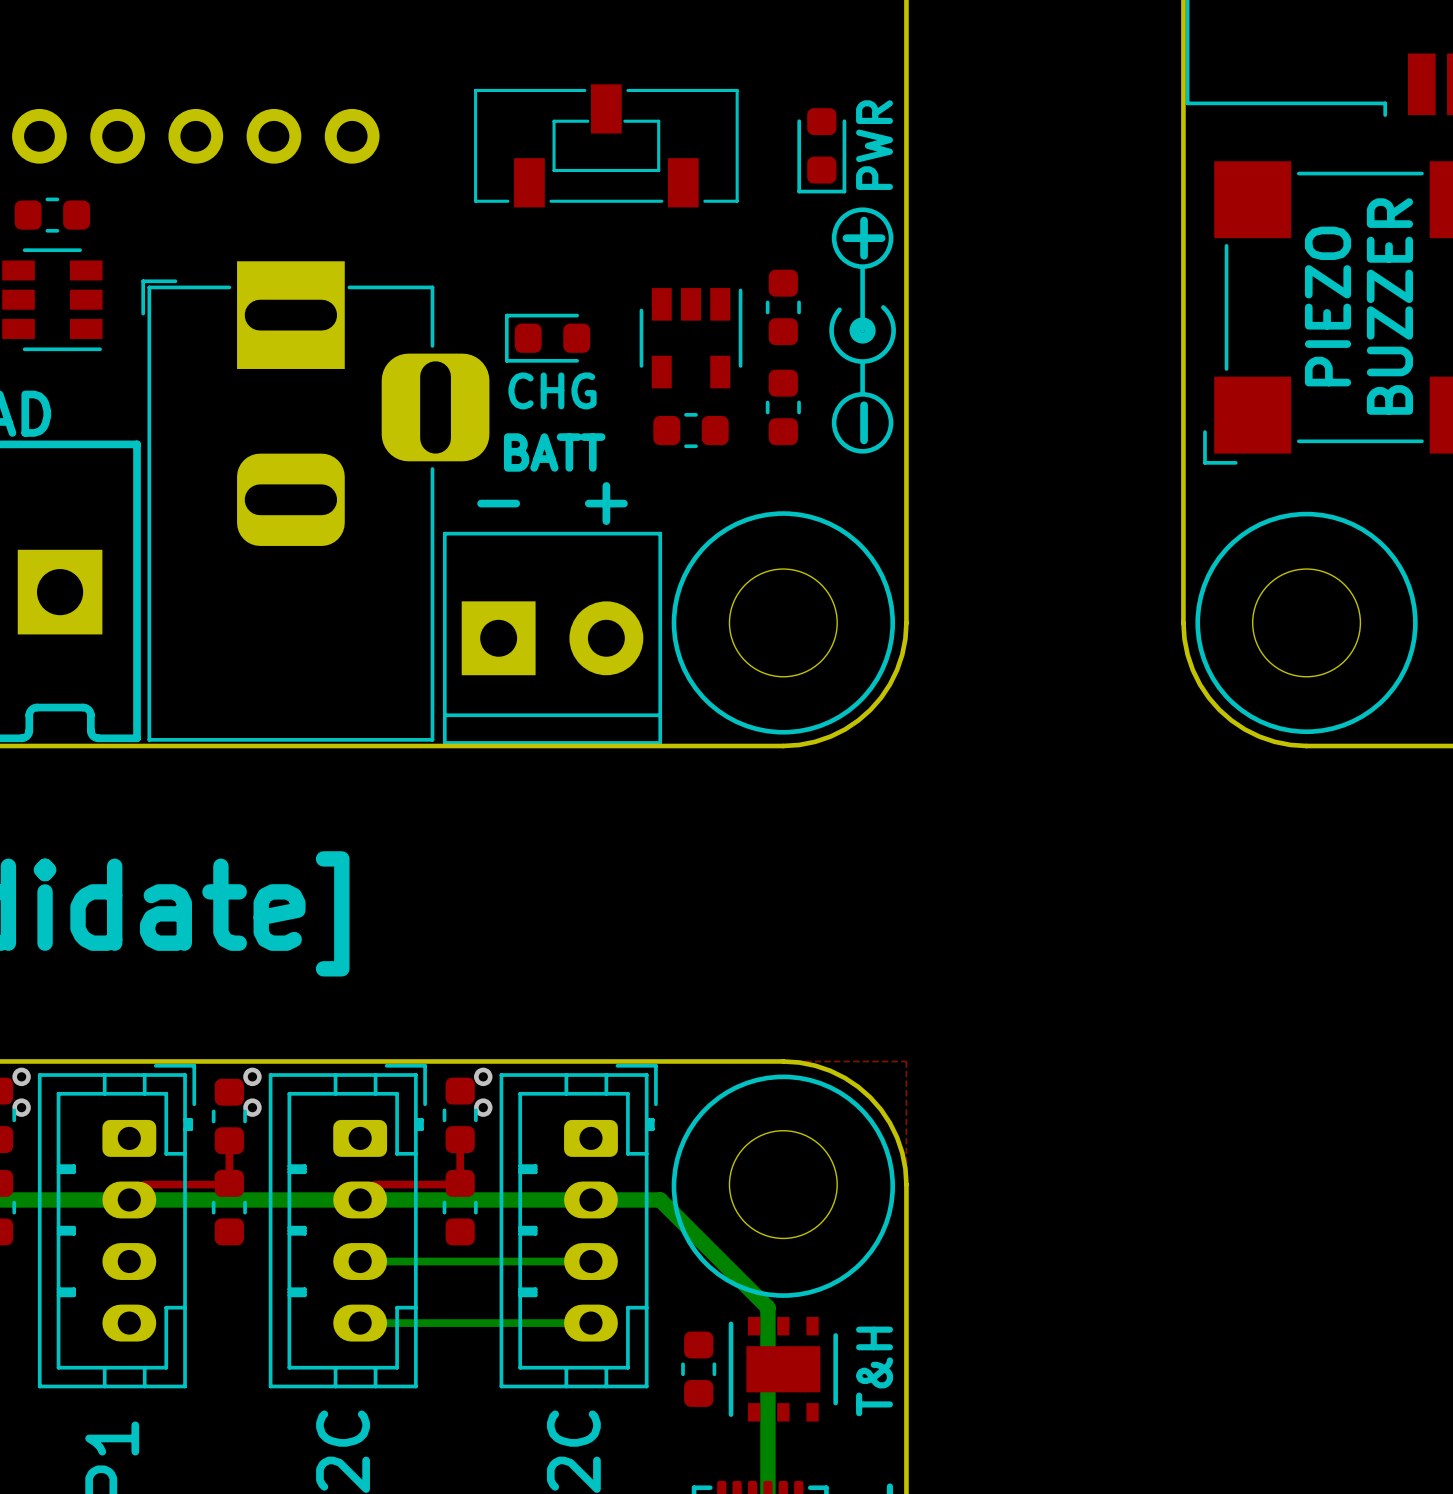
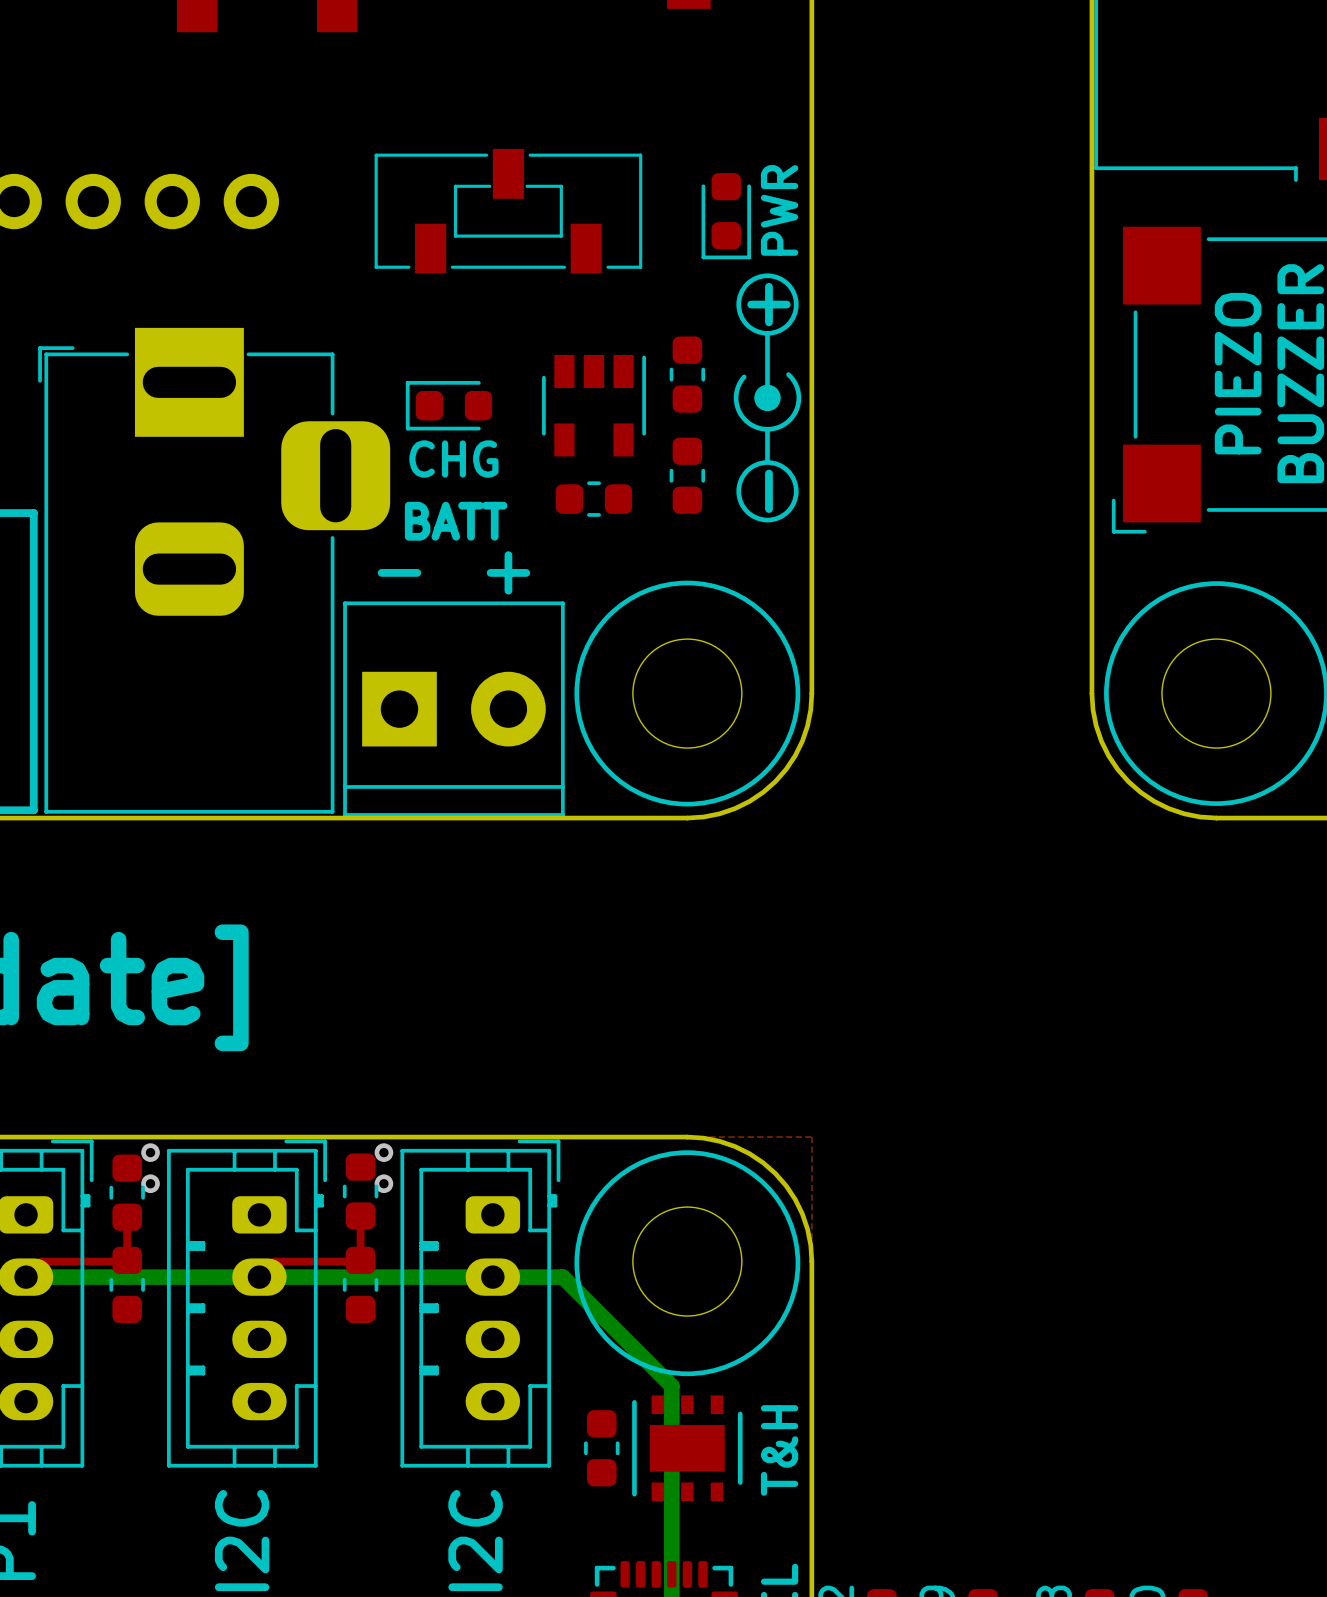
bottom track: (360, 1261) (590, 1261) -> none
bottom track: (360, 1323) (590, 1323) -> none

